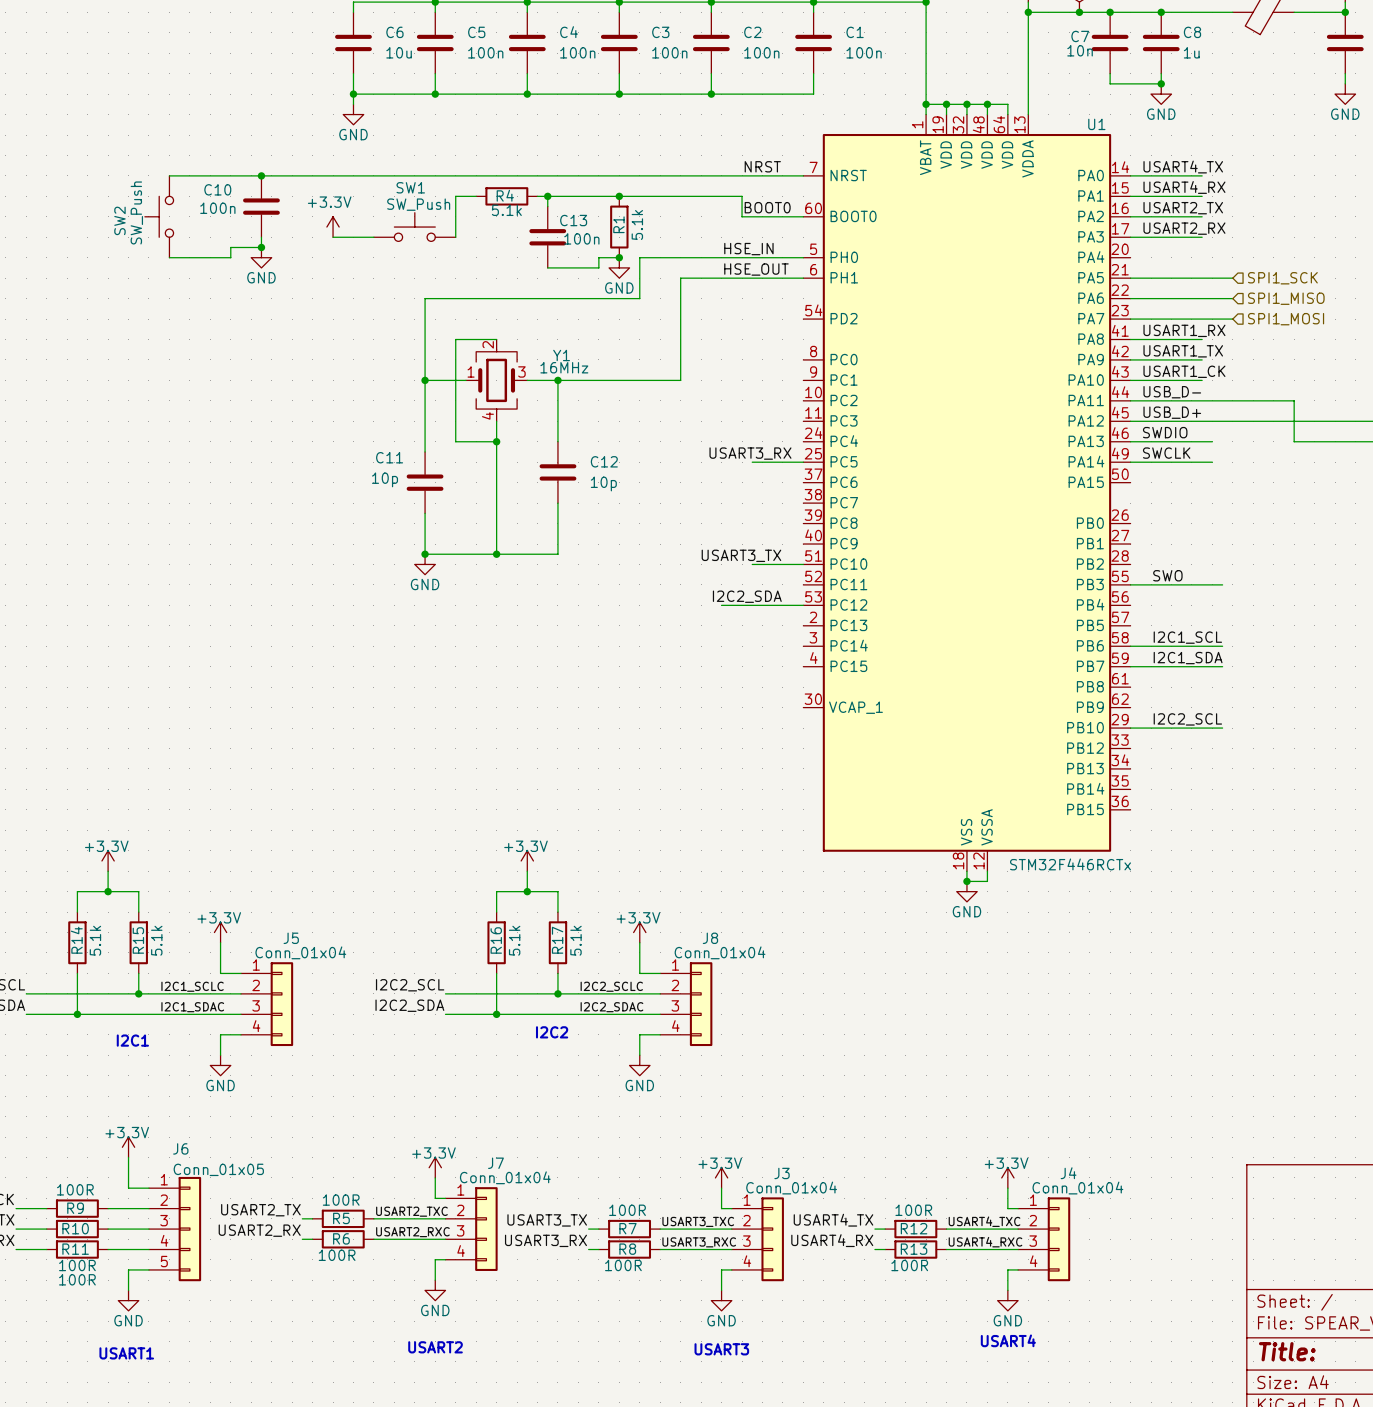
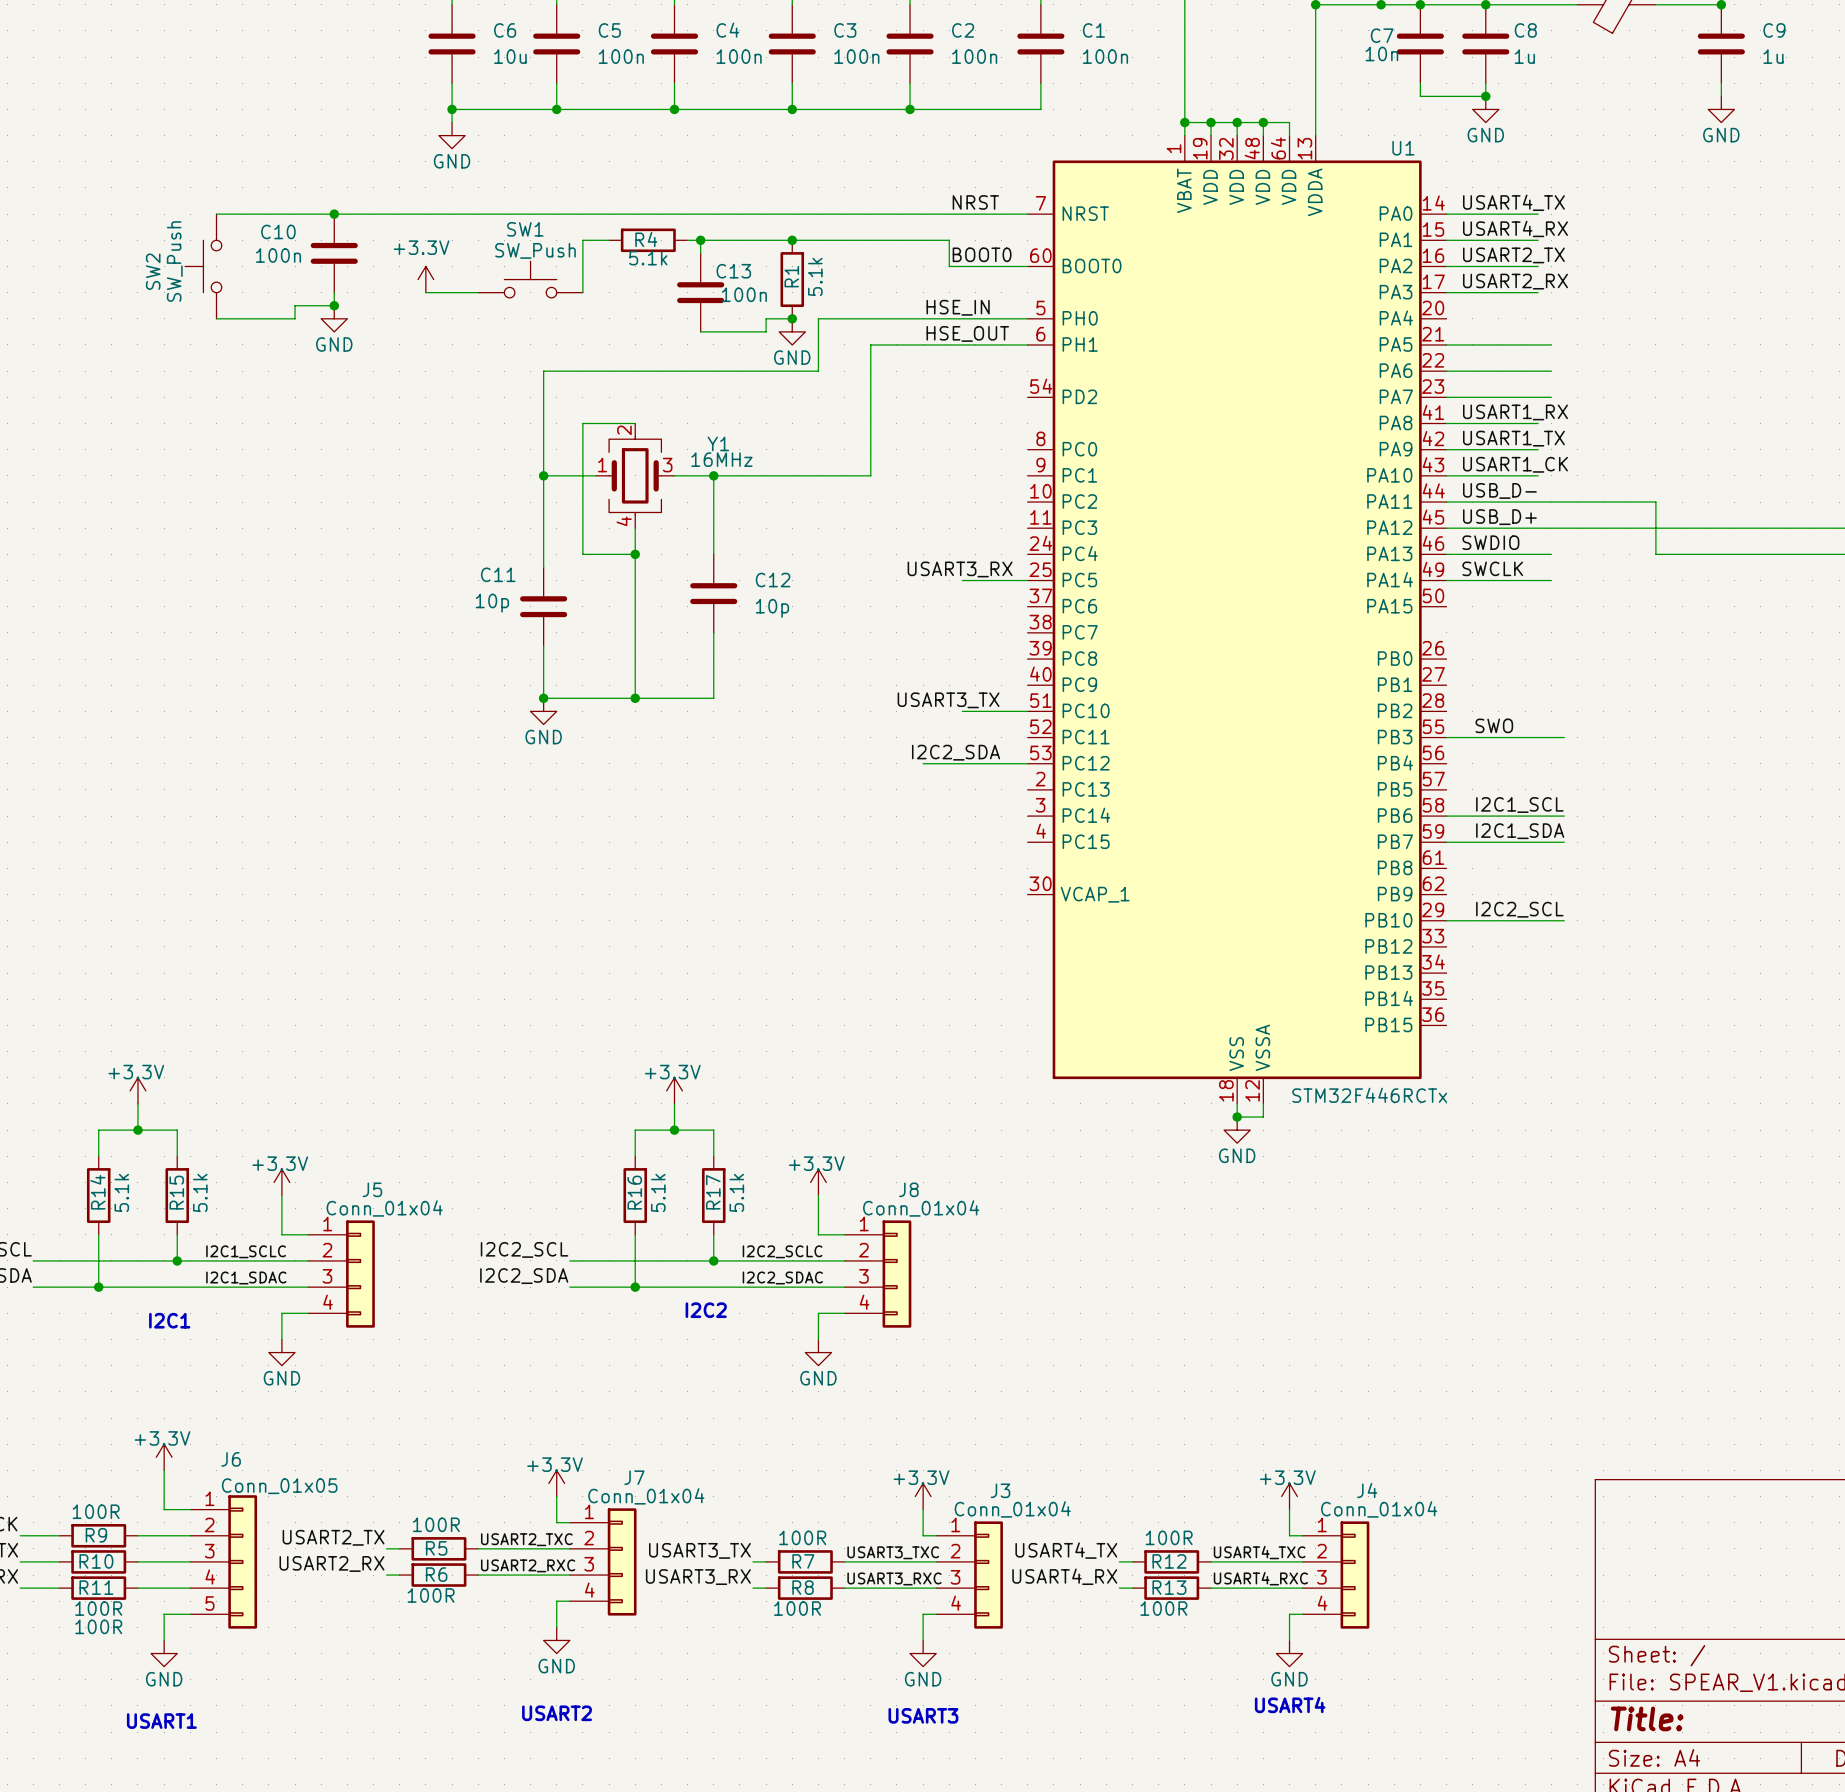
wire: (1212, 278) (1232, 278) -> none
hierarchical label: SPI1_SCK (1282, 278) -> none
wire: (1212, 298) (1232, 298) -> none
hierarchical label: SPI1_MISO (1286, 298) -> none
wire: (1212, 319) (1232, 319) -> none
hierarchical label: SPI1_MOSI (1286, 319) -> none

